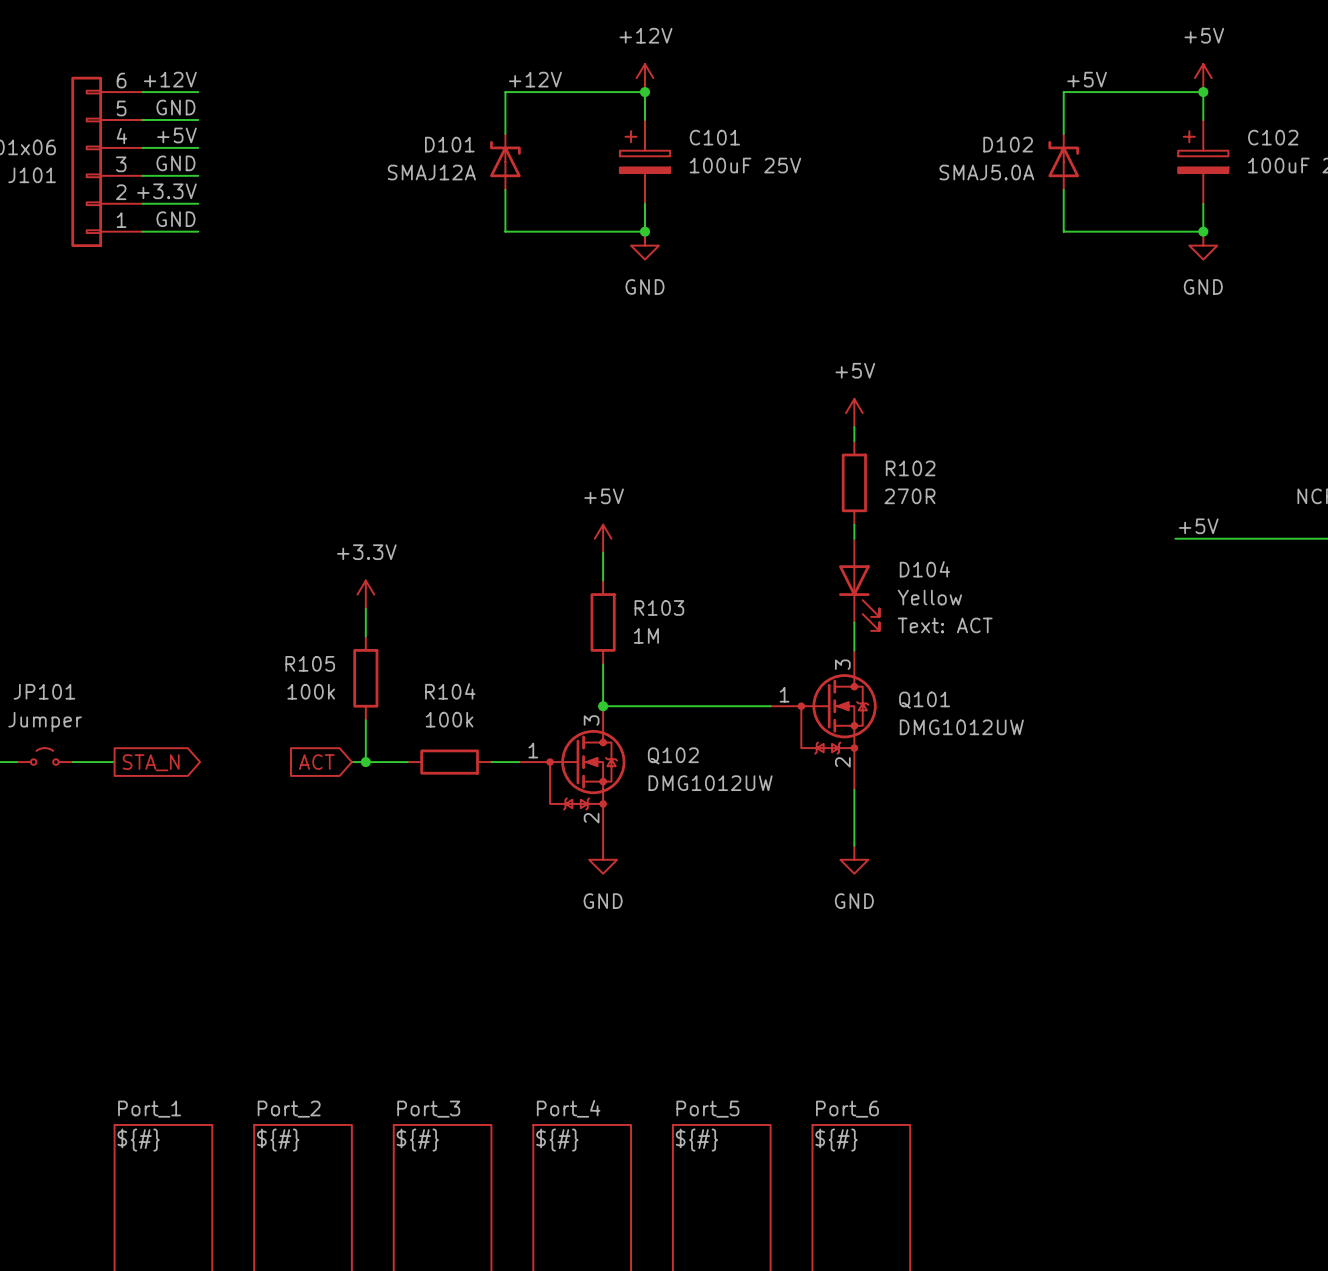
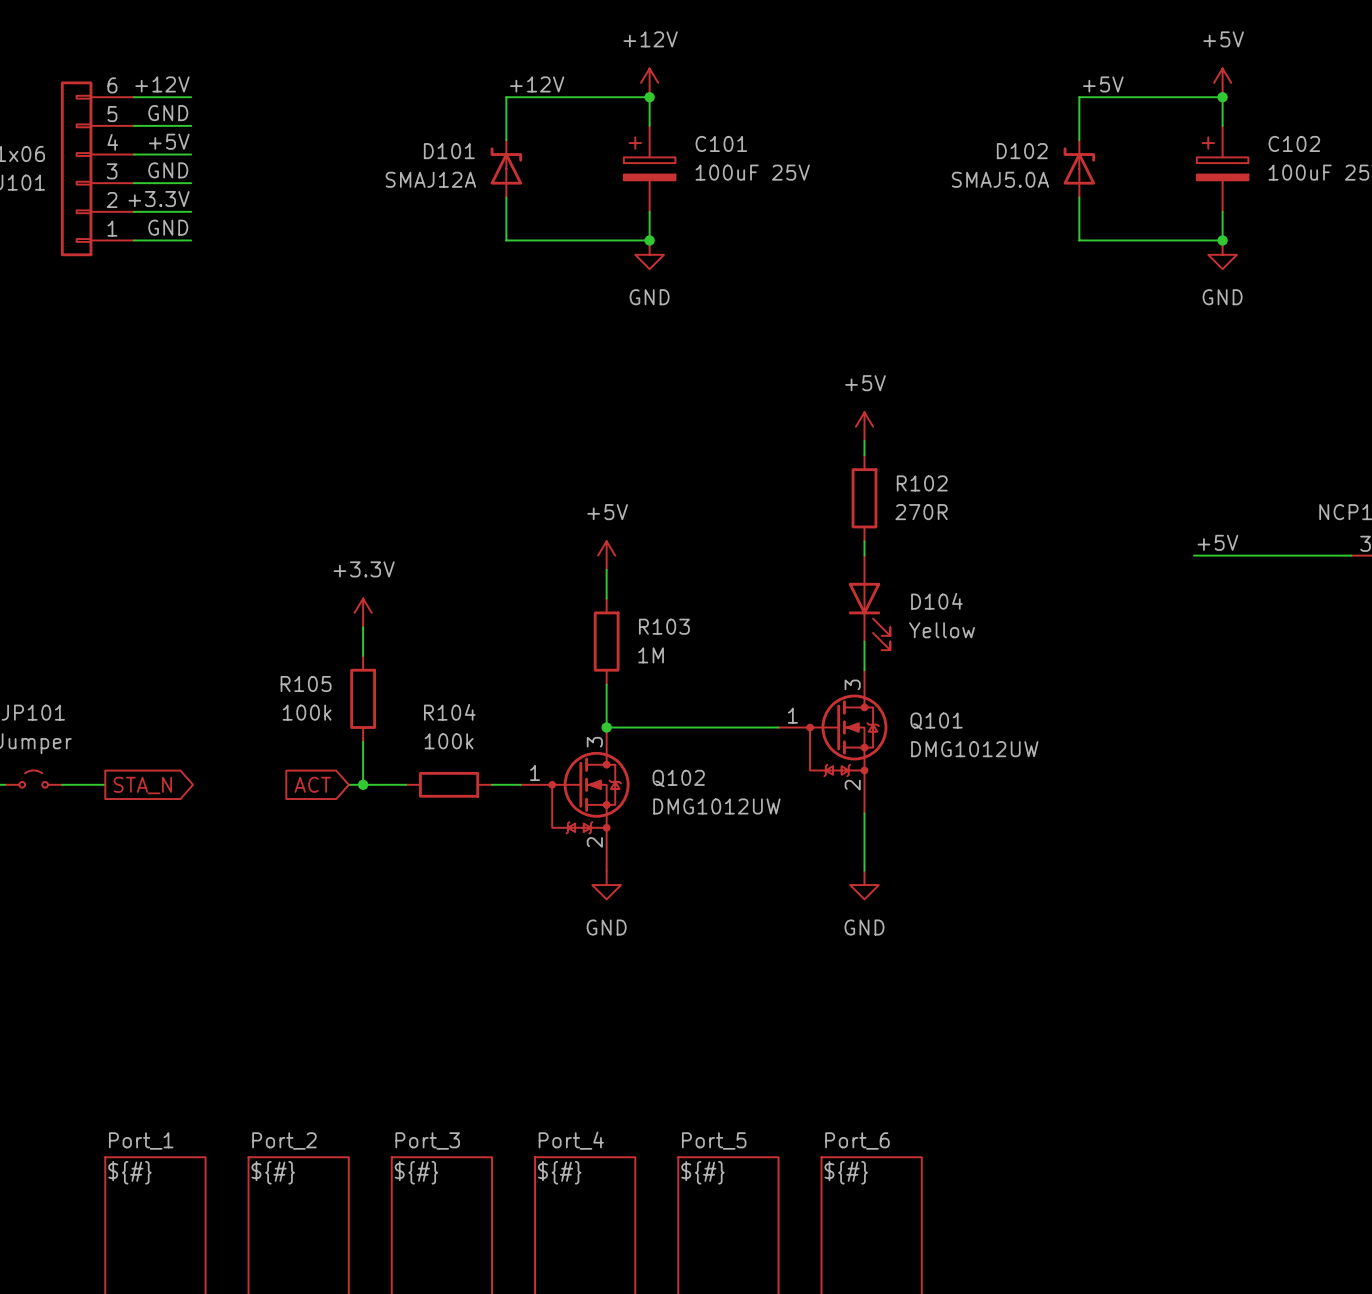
D104 name position: D104 (924, 569) -> D104 (936, 601)
D104 value position: Yellow (929, 597) -> Yellow (942, 630)
D104 text: Text: ACT (945, 625) -> none

